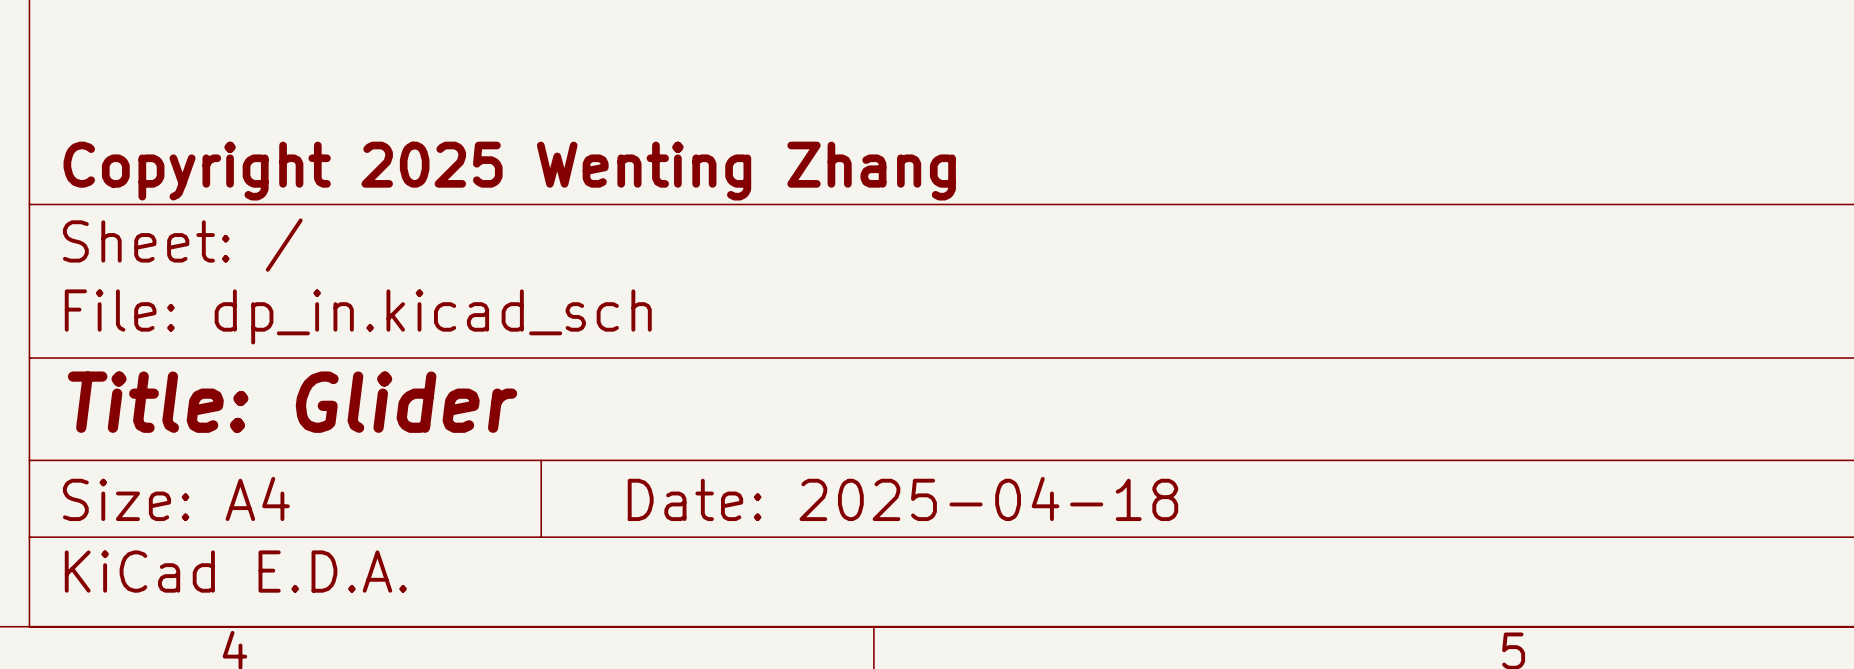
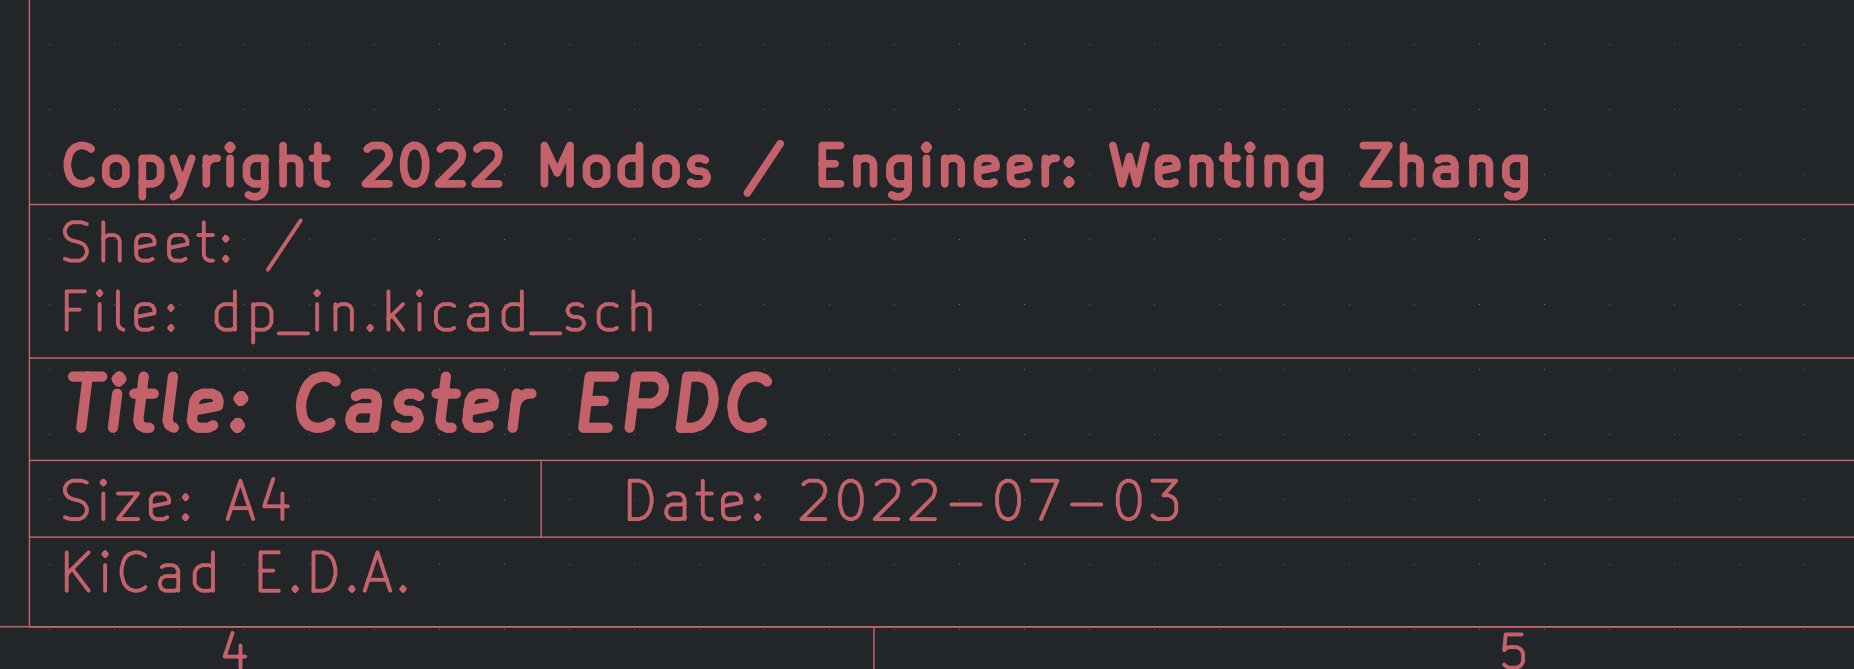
title block: Copyright 2025 Wenting Zhang (509, 171) -> Copyright 2022 Modos / Engineer: Wenting Zhang (795, 170)
title block: Title: Glider (292, 402) -> Title: Caster EPDC (420, 402)
title block: Date: 2025-04-18 (902, 498) -> Date: 2022-07-03 (902, 499)

